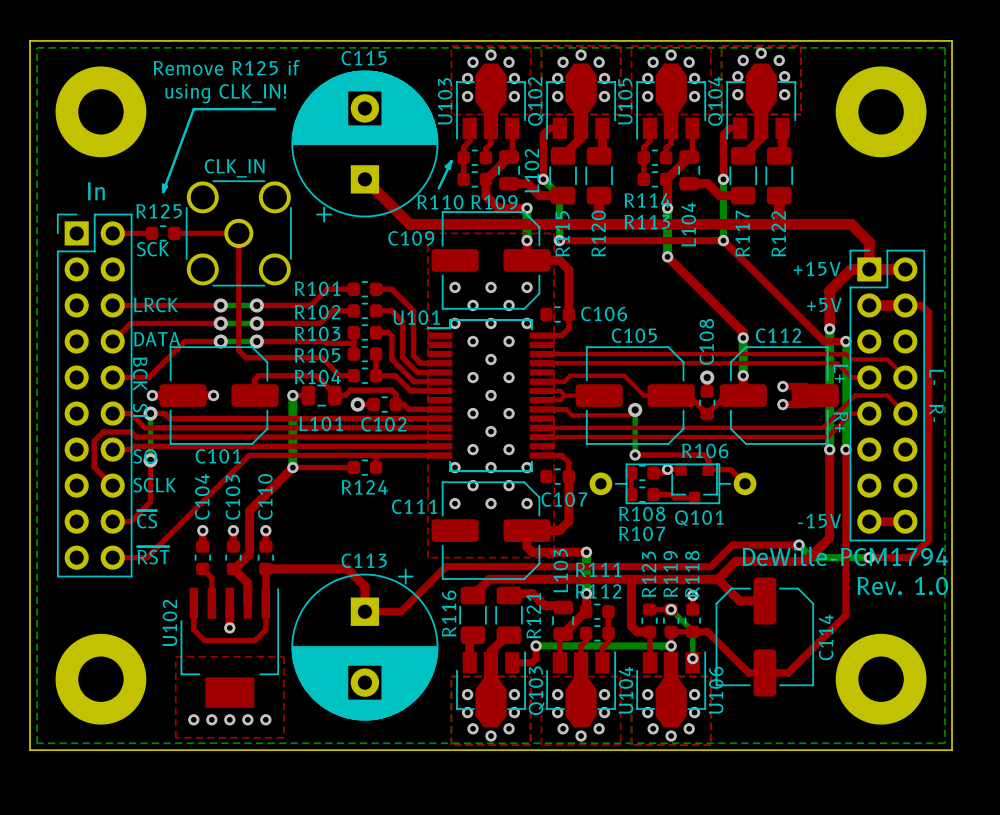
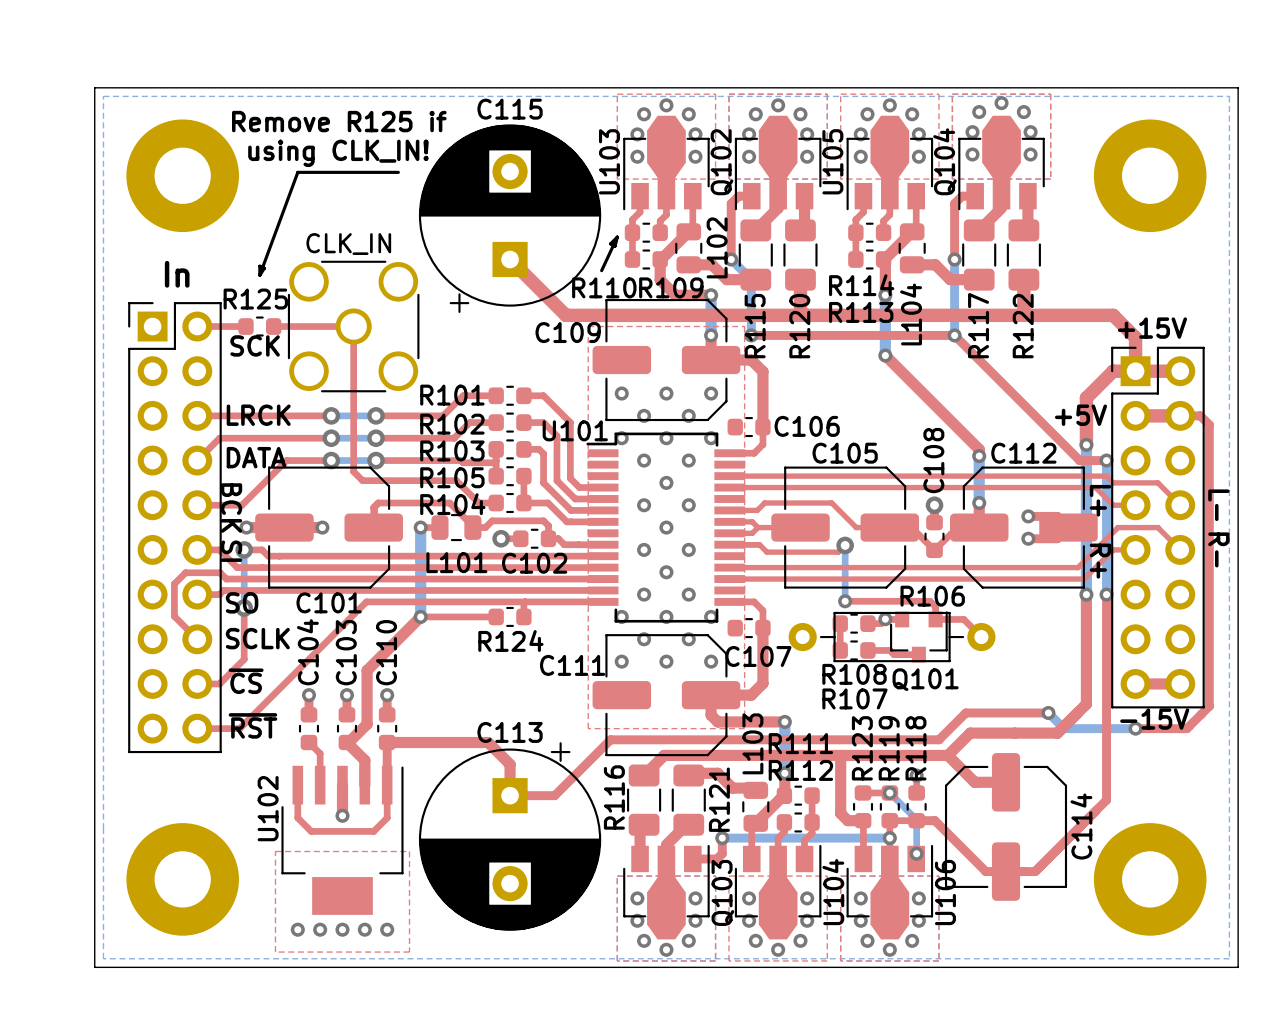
text position: +15V (817, 268) -> +15V (1152, 328)
text position: -15V (819, 521) -> -15V (1154, 719)
text: DeWille-PCM1794 (845, 556) -> none
text: Rev. 1.0 (902, 586) -> none

